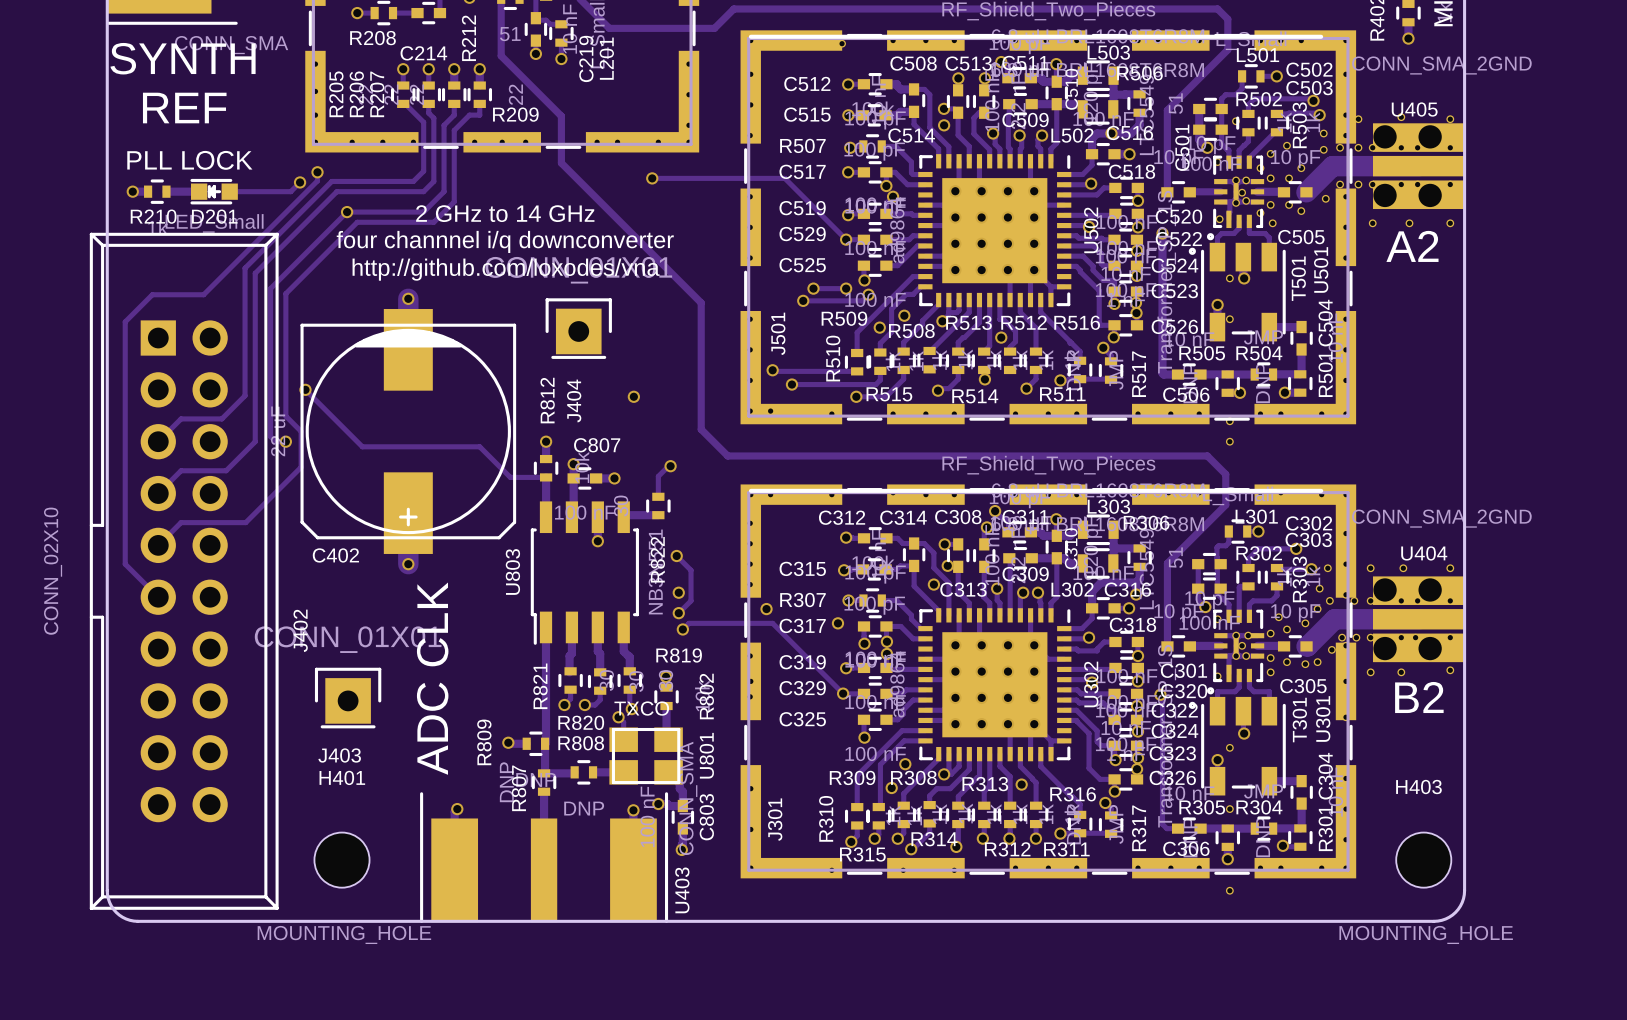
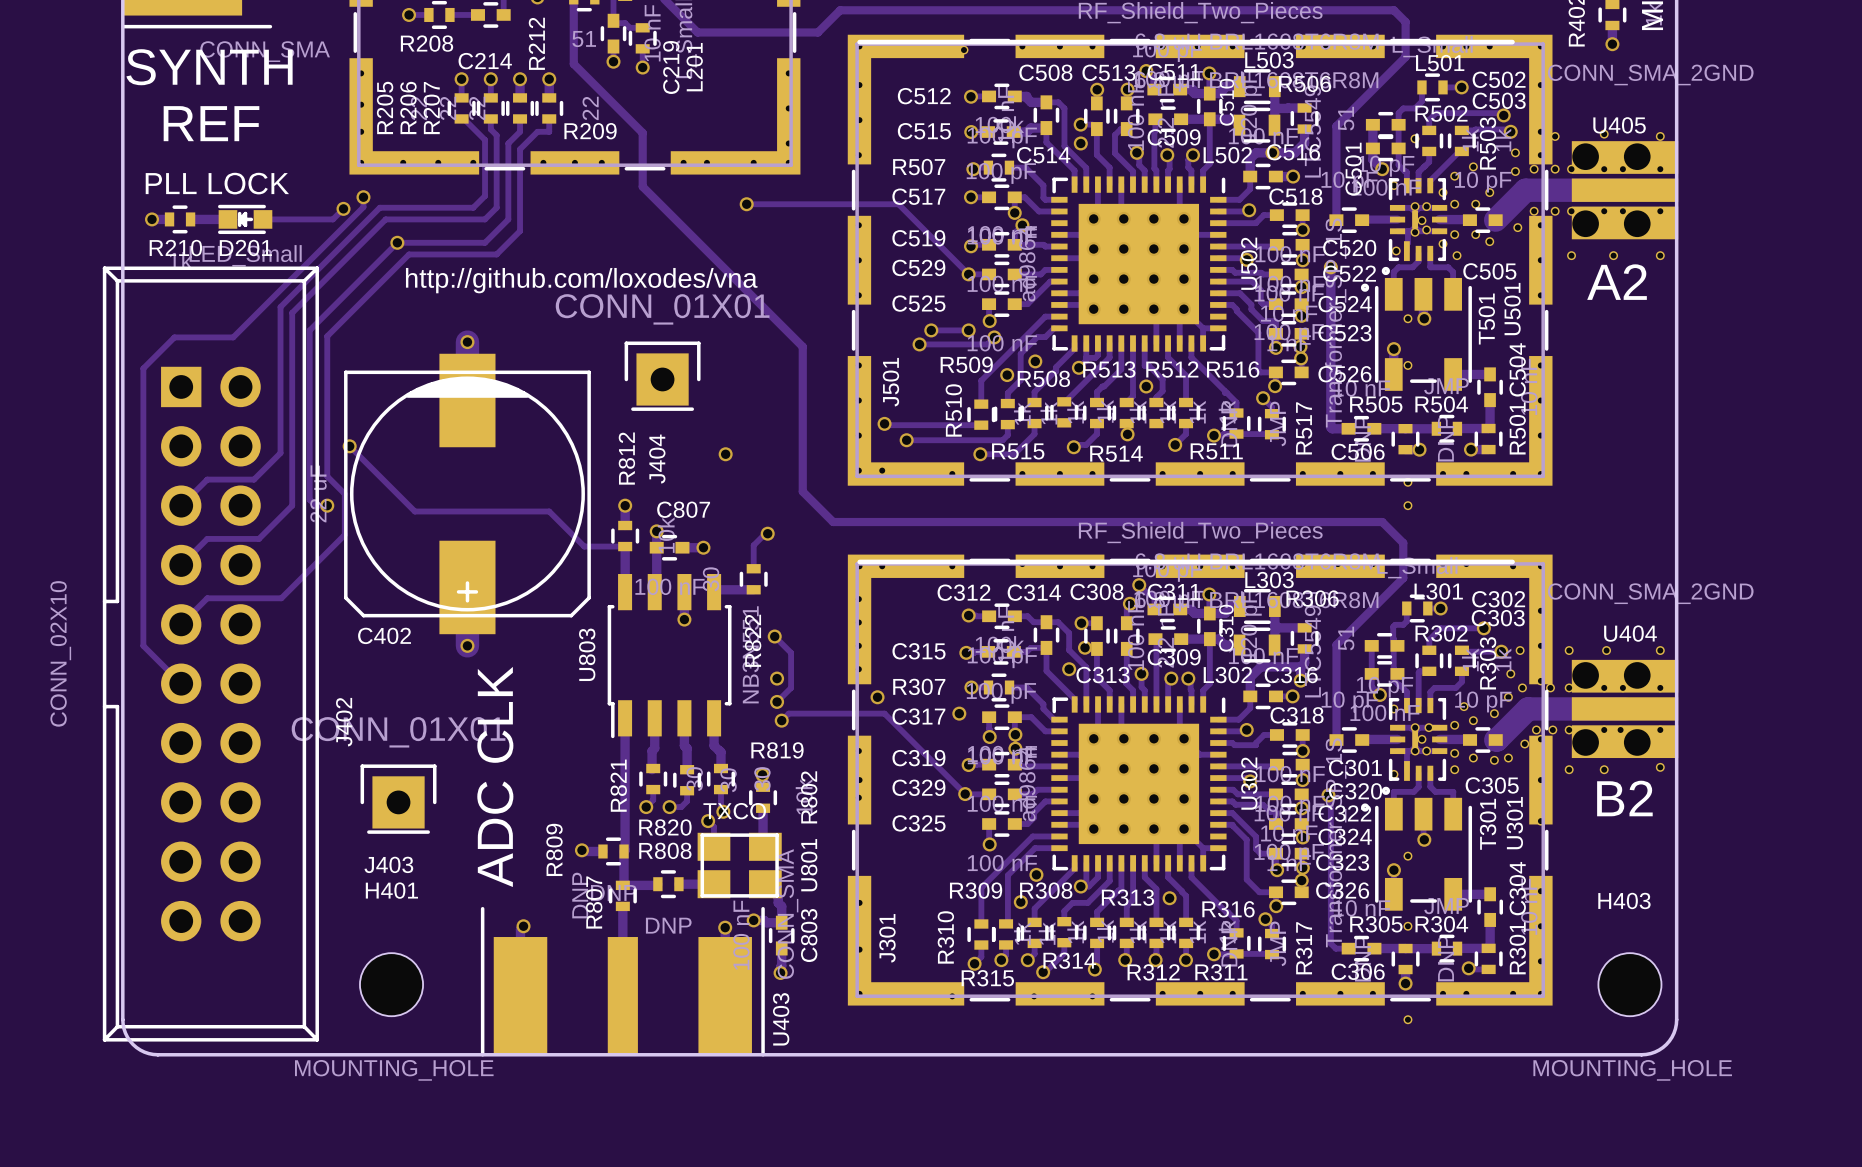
text: 2 GHz to 14 GHz (505, 213) -> none
text: four channnel i/q downconverter (505, 241) -> http://github.com/loxodes/vna (581, 280)
text: http://github.com/loxodes/vna (506, 269) -> none

